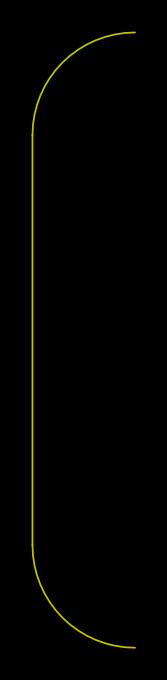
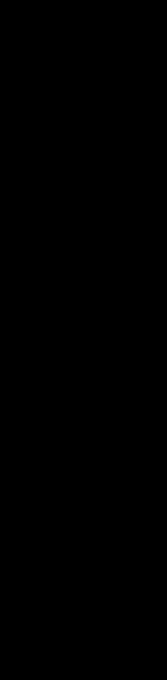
board edge: (135, 32) (115, 34) (95, 40) (78, 49) (62, 62) (49, 78) (40, 95) (34, 115) (32, 135) (32, 545) (34, 565) (44, 593) (55, 610) (69, 624) (95, 639) (115, 645) (135, 647) -> none

